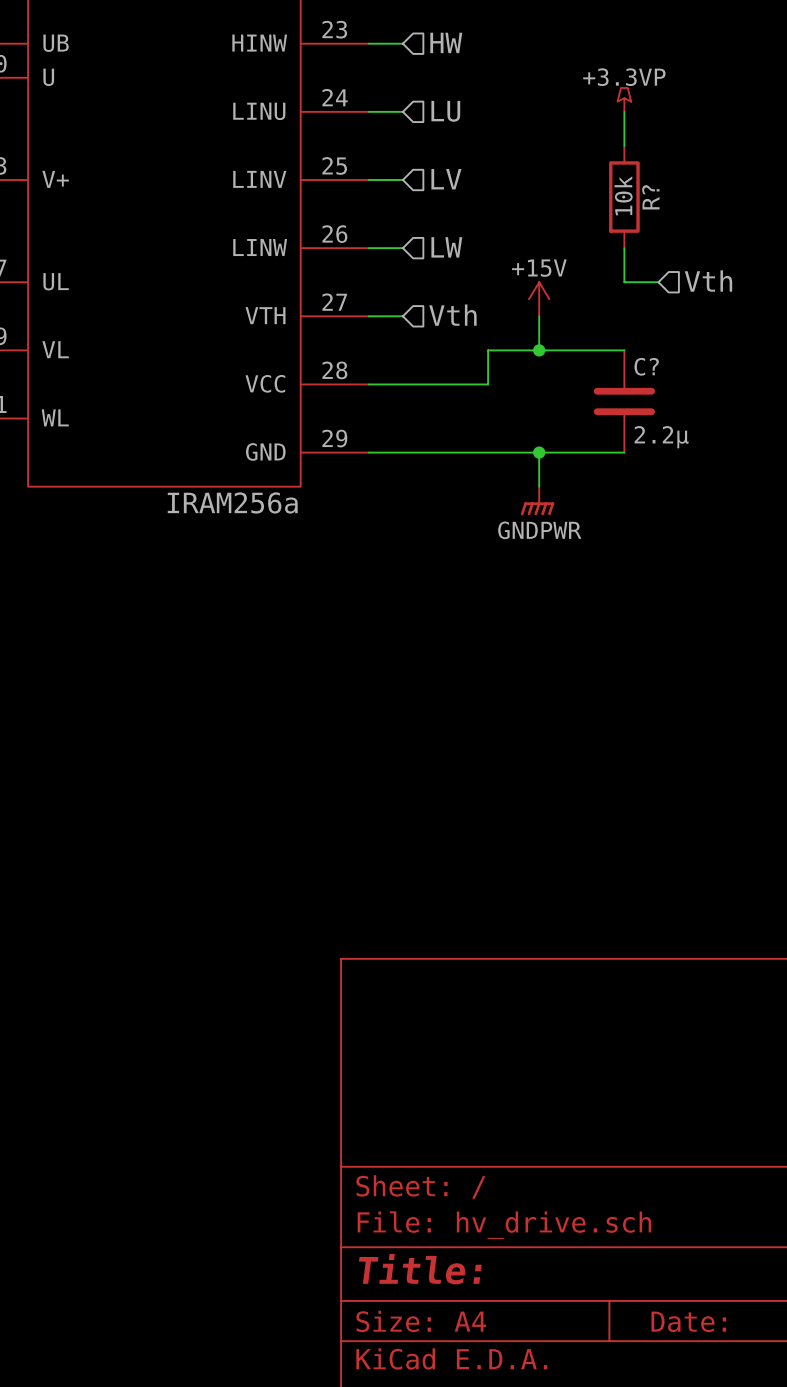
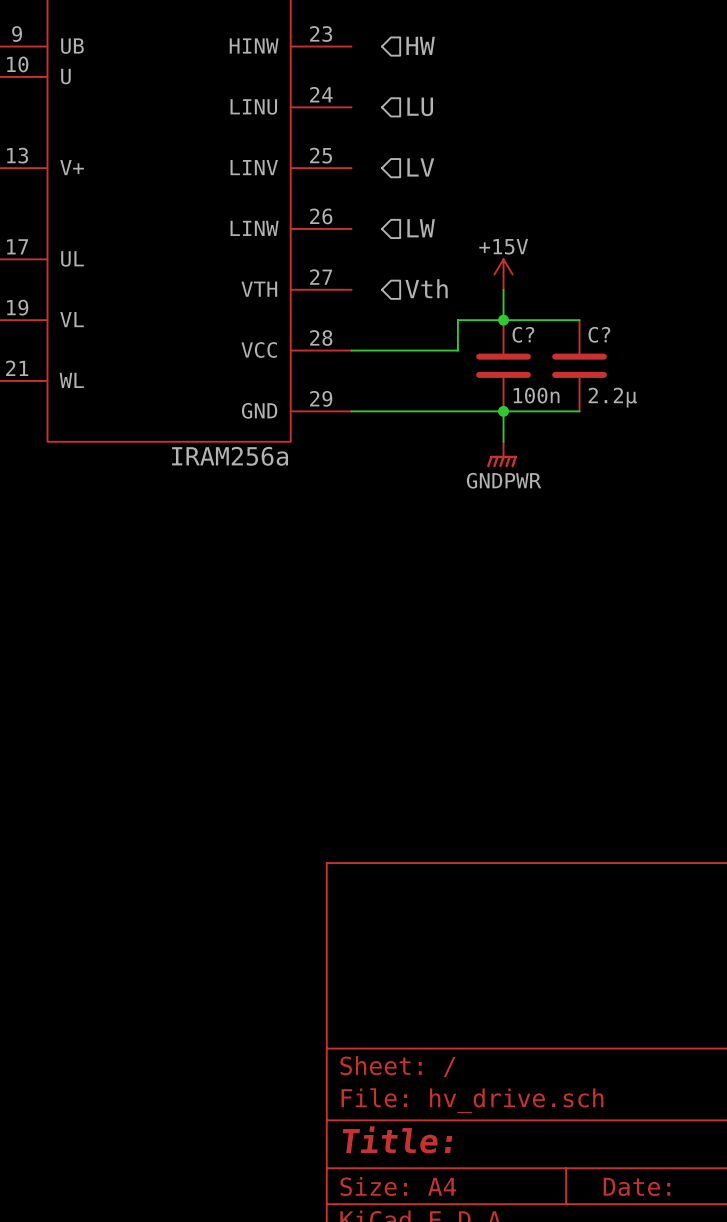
wire: (368, 43) (402, 43) -> none
power symbol: +3.3VP (624, 99) -> none
wire: (368, 111) (402, 111) -> none
wire: (624, 111) (624, 145) -> none
wire: (368, 180) (402, 180) -> none
R?: 10k (624, 197) -> none
wire: (368, 248) (402, 248) -> none
wire: (624, 248) (624, 282) (658, 282) -> none
hierarchical label: Vth (708, 281) -> none
wire: (368, 316) (402, 316) -> none
C?: none -> 100n (503, 365)

